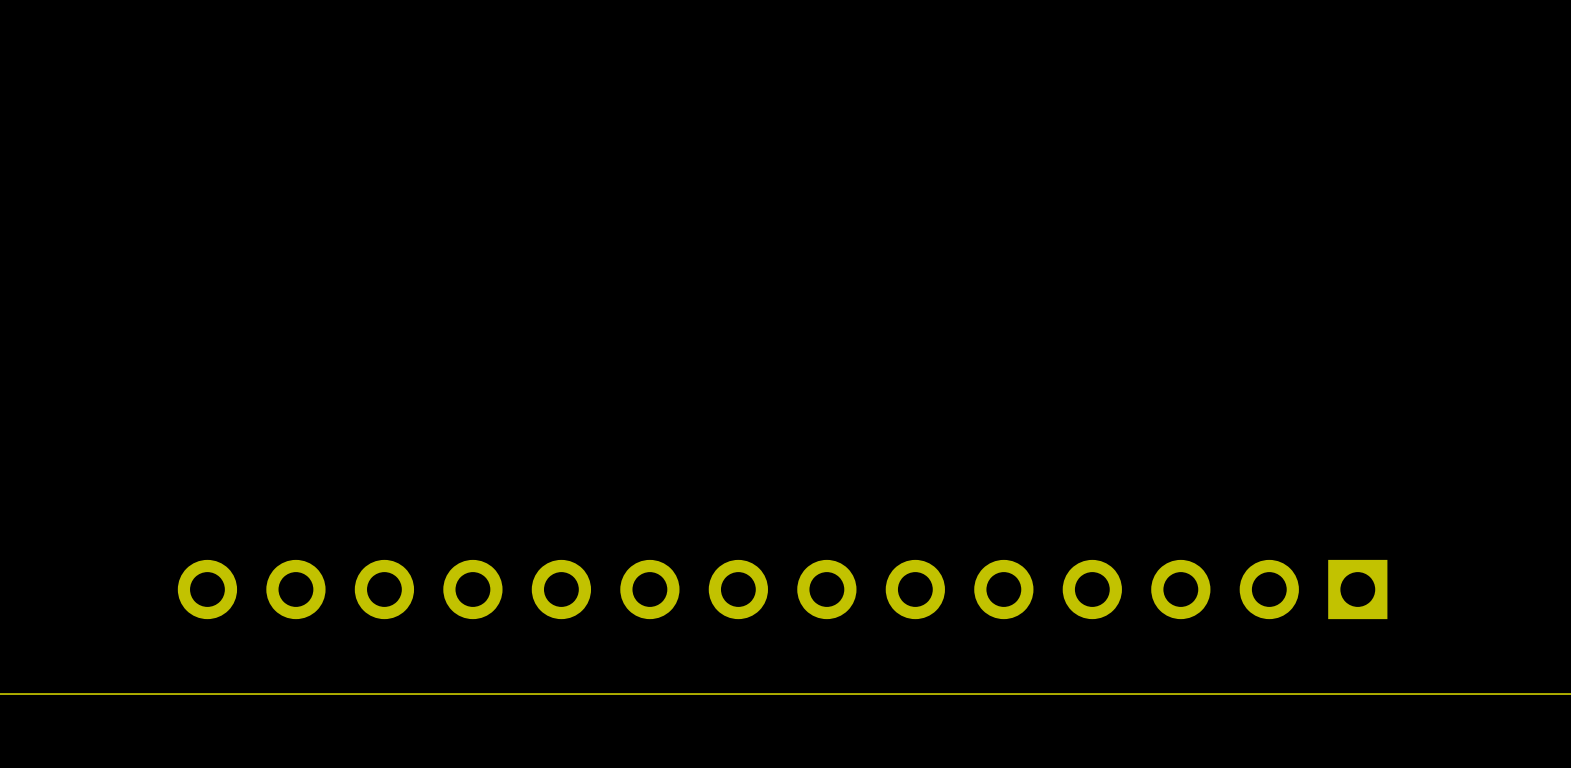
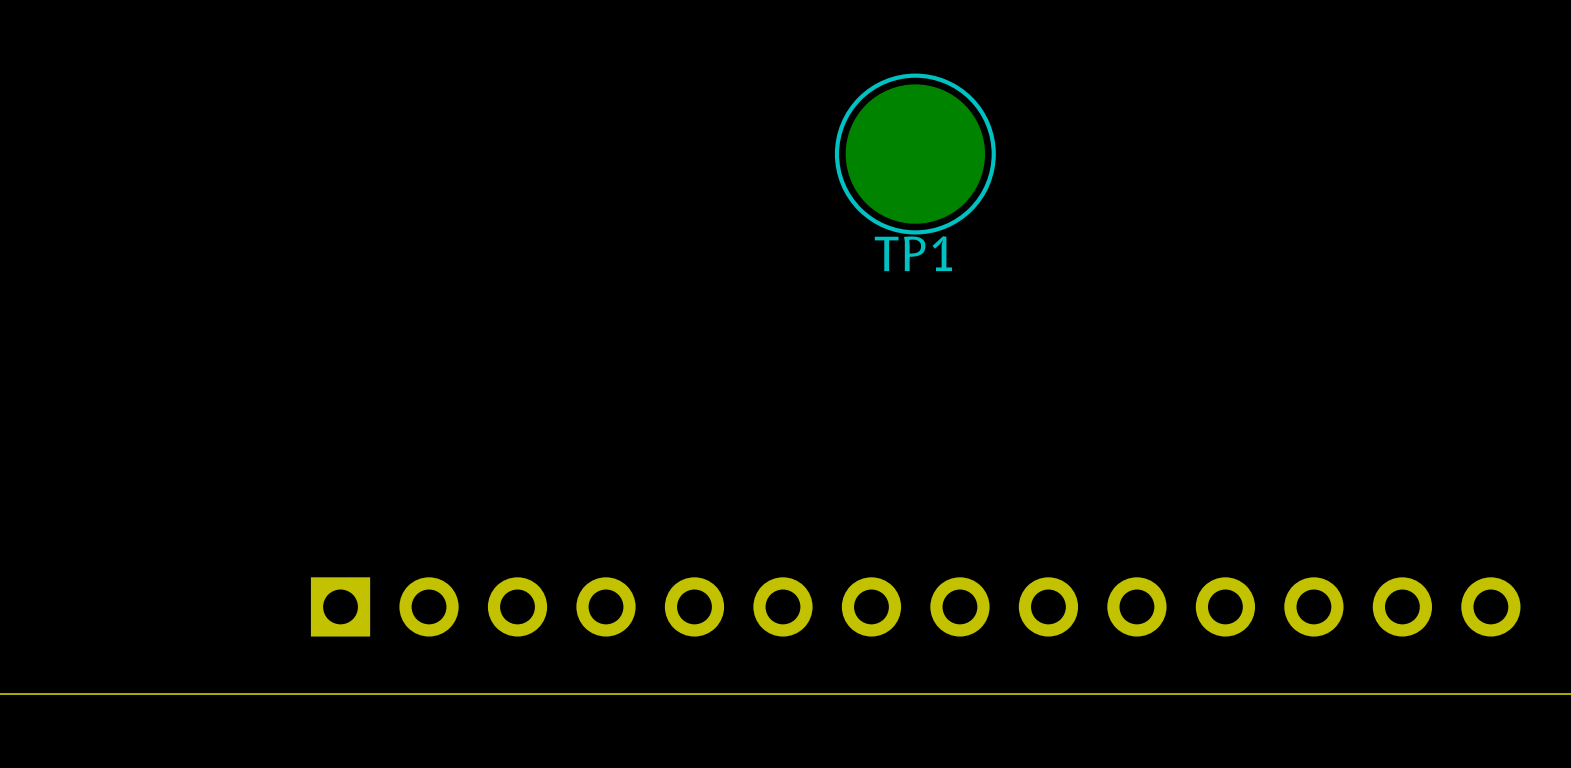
TP1: none -> (915, 154)
part rotation: 0° (782, 589) -> 180° (915, 606)

